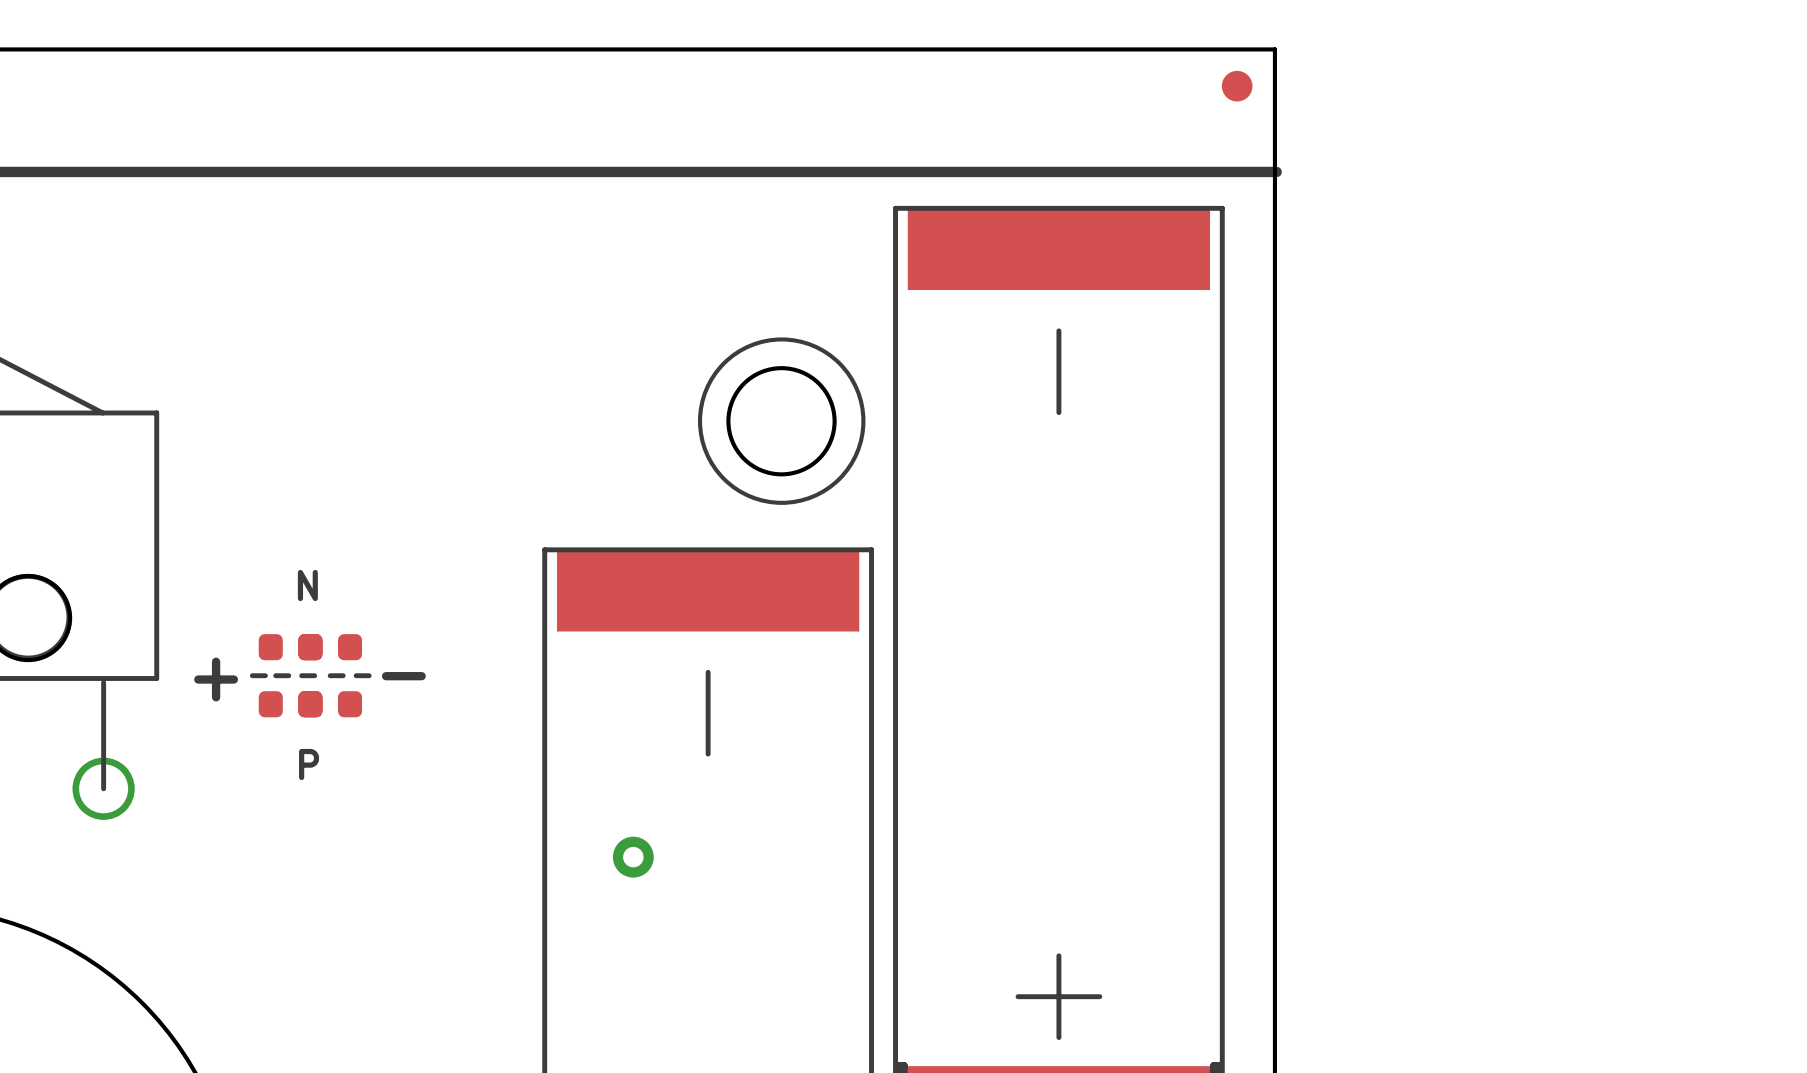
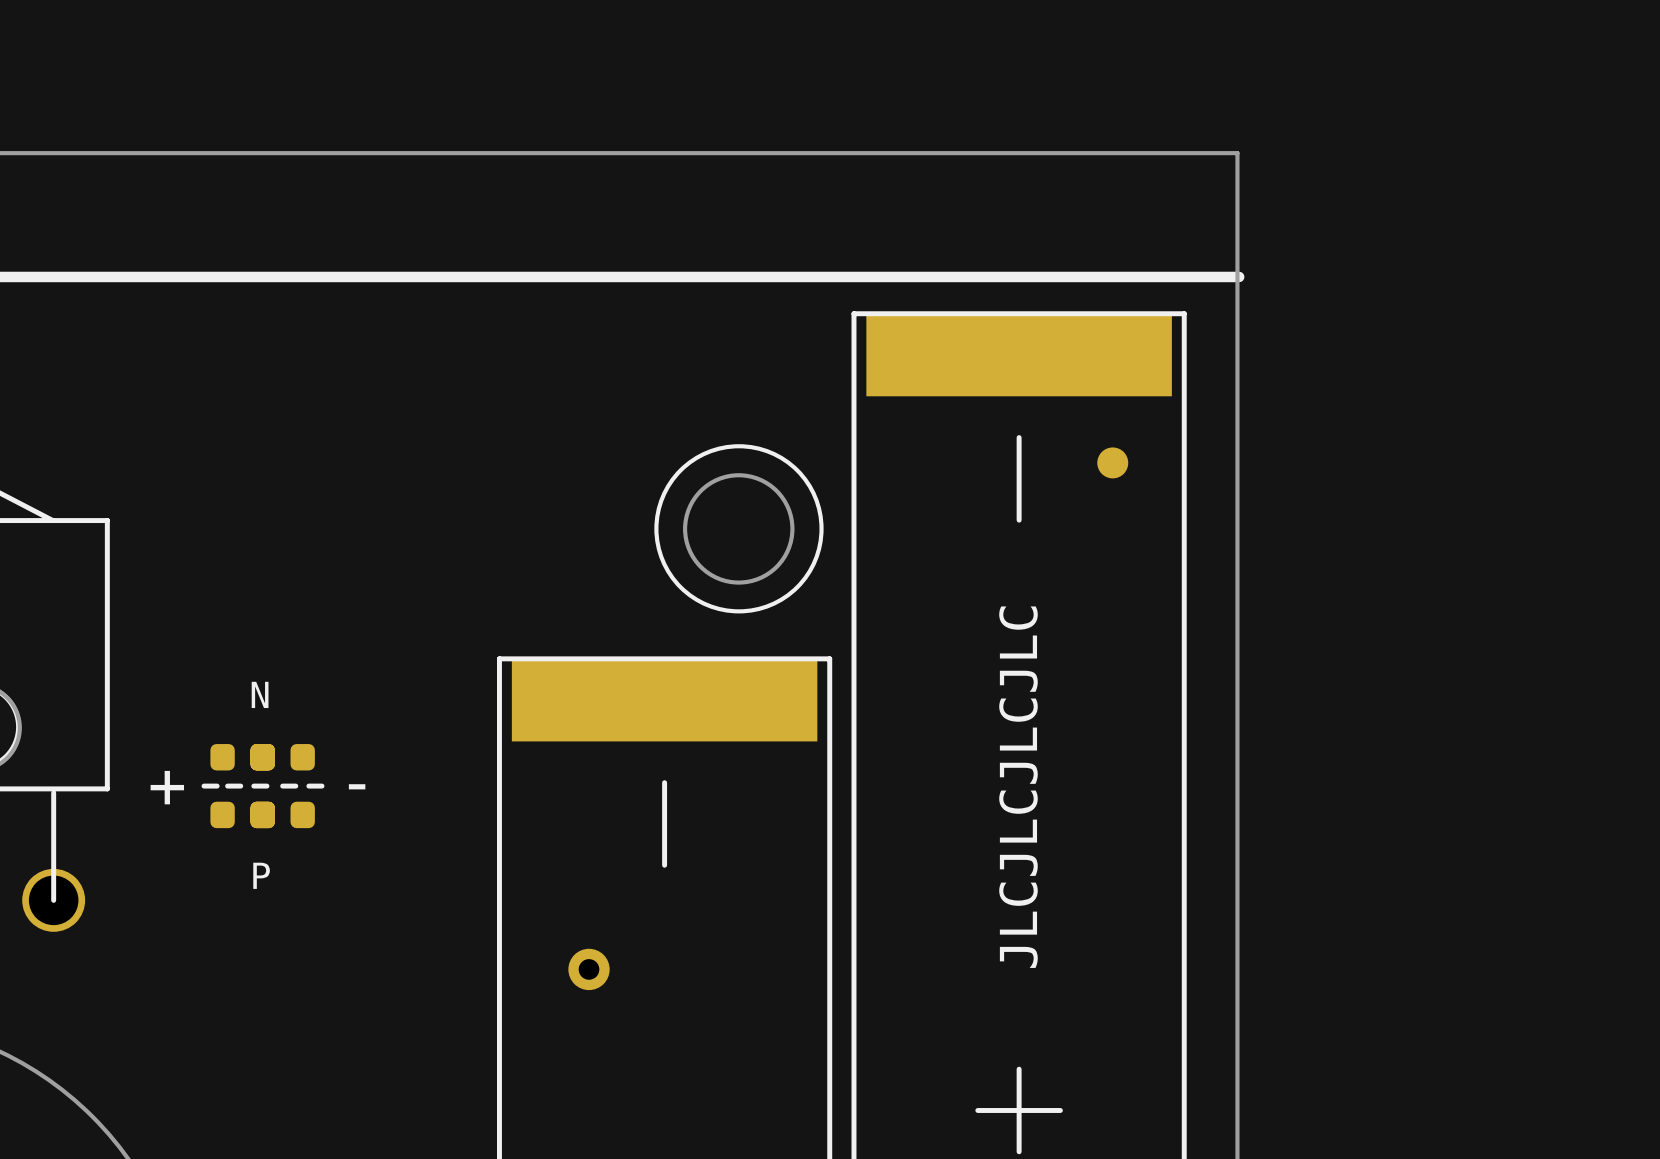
part position: (1237, 86) -> (1112, 462)
text: none -> JLCJLCJLCJLC (1018, 787)

